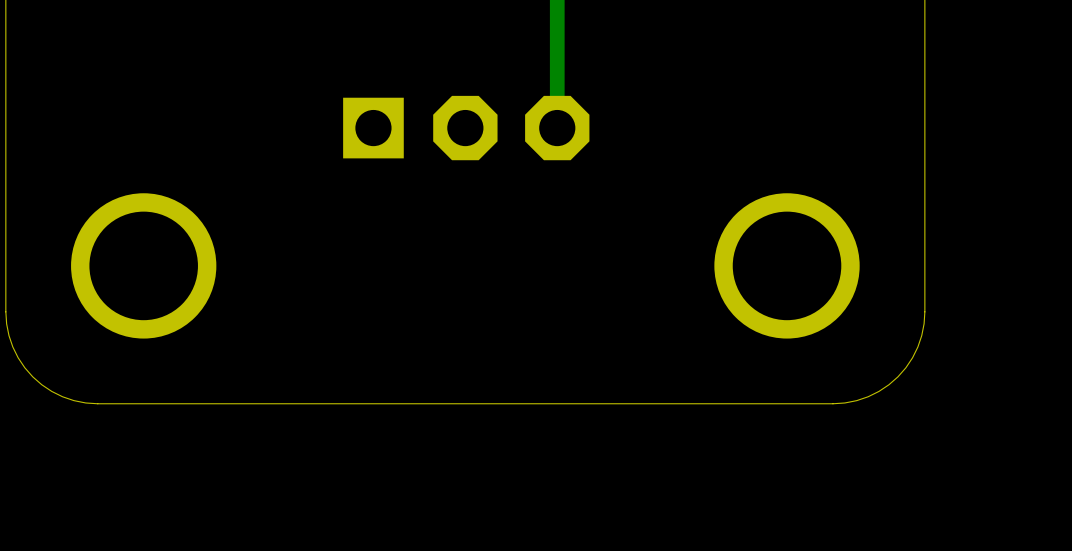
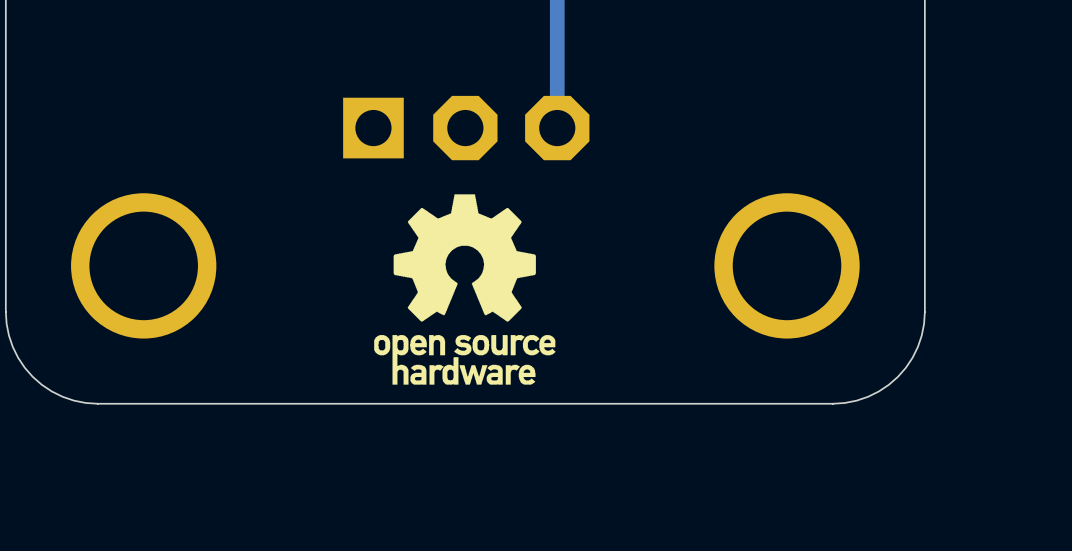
drawing: none -> [374, 194, 556, 385]

